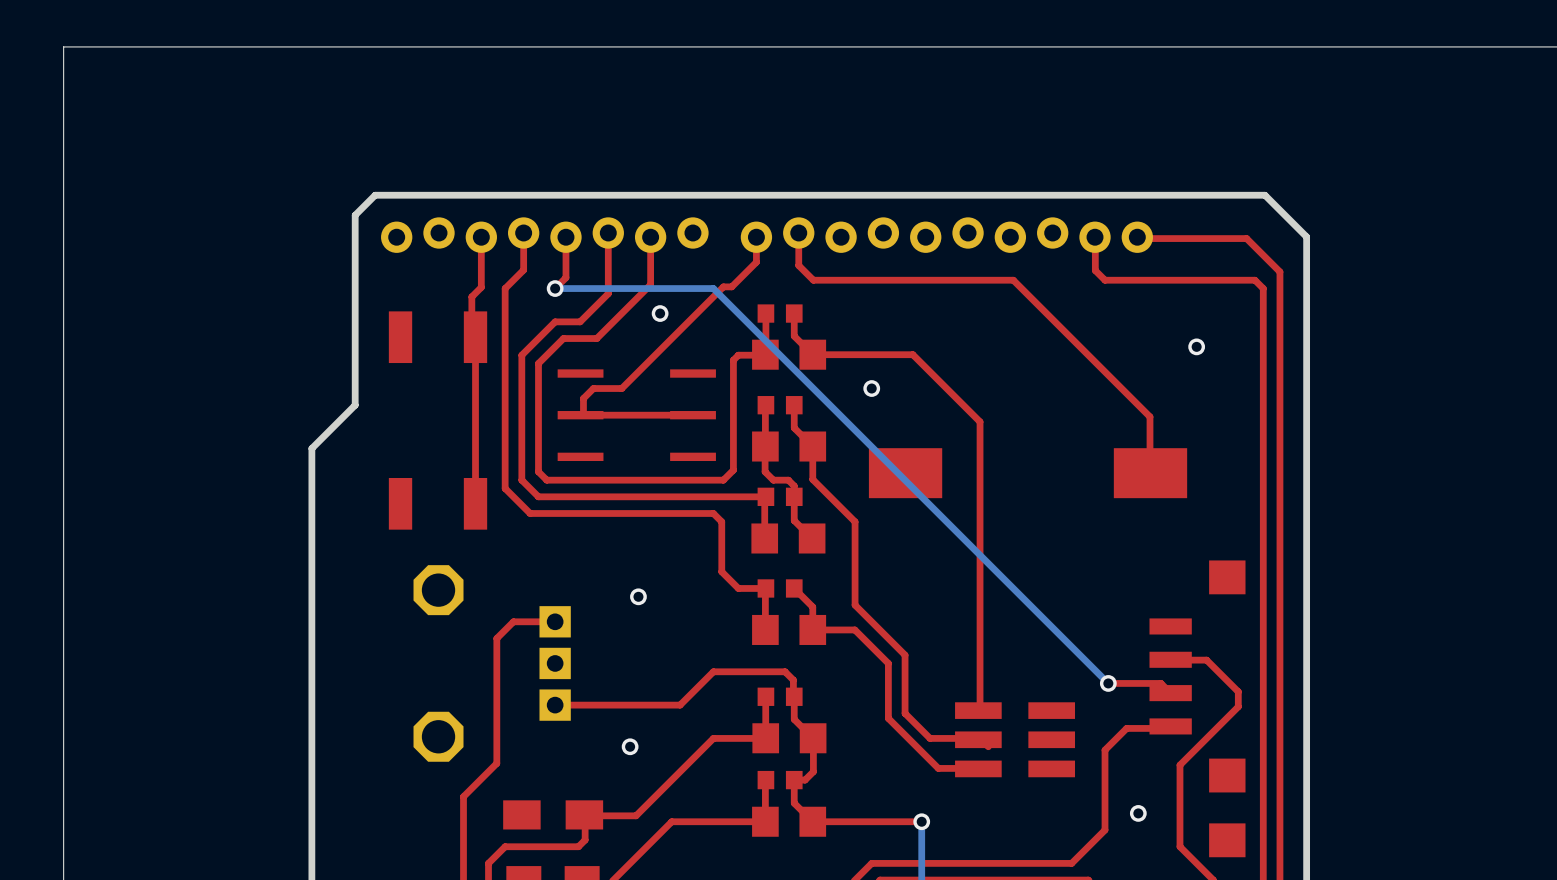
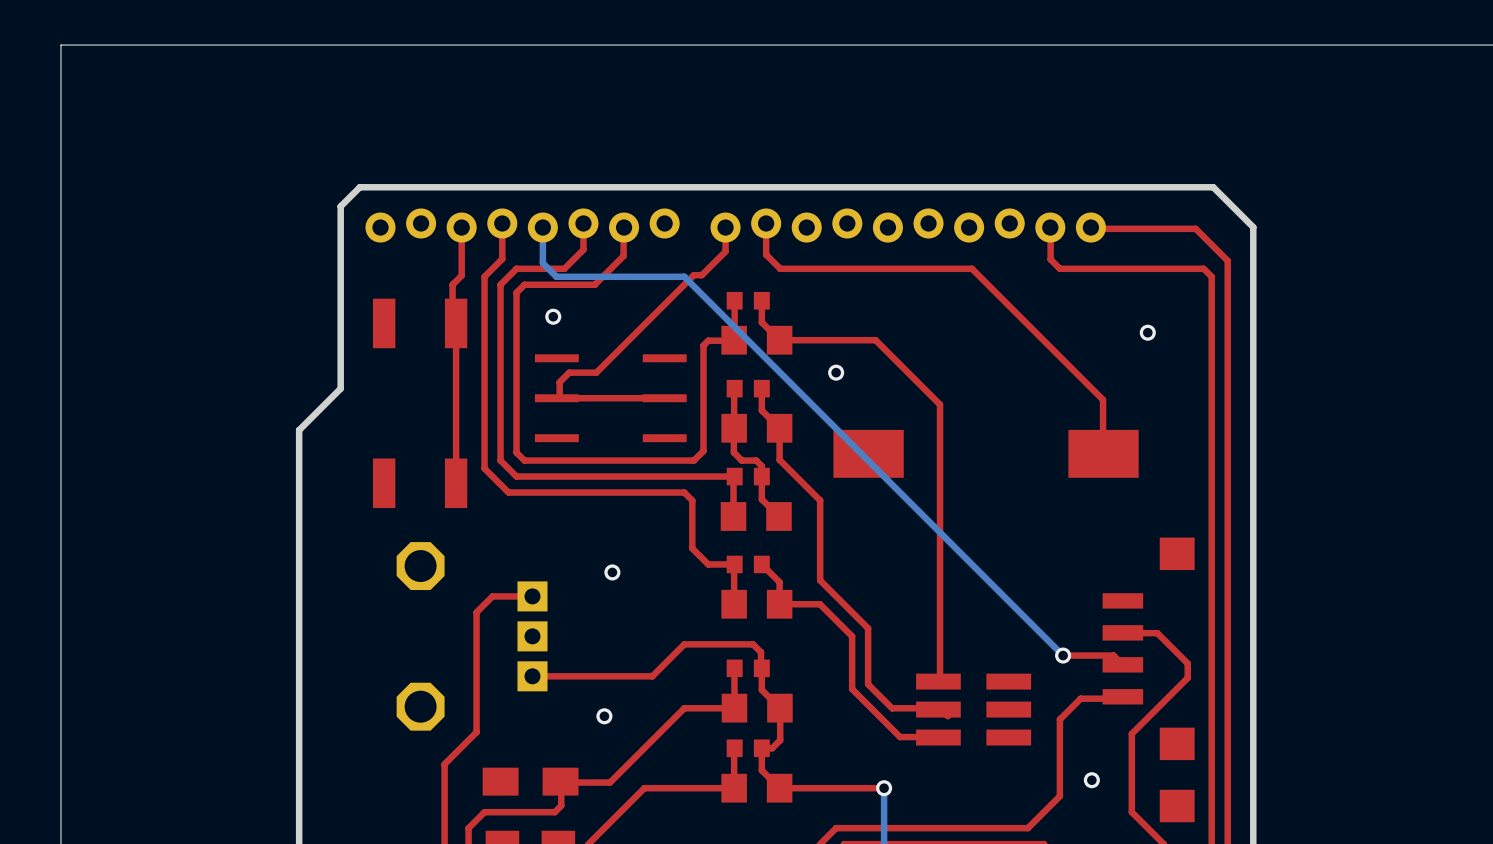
top track: (565, 237) (565, 277) (555, 288) -> none
top track: (650, 242) (650, 284) (596, 338) (563, 338) (538, 363) -> (624, 227) (623, 255) (594, 284) (524, 284) (516, 292) (516, 348)
top track: (608, 260) (608, 293) (580, 321) (555, 321) (521, 355) -> (583, 249) (564, 268) (516, 268) (500, 284) (500, 340)
via: (555, 288) -> none
bottom track: (580, 288) (555, 288) -> (556, 276) (542, 263) (542, 227)
via: (660, 313) -> none
via: none -> (553, 316)

